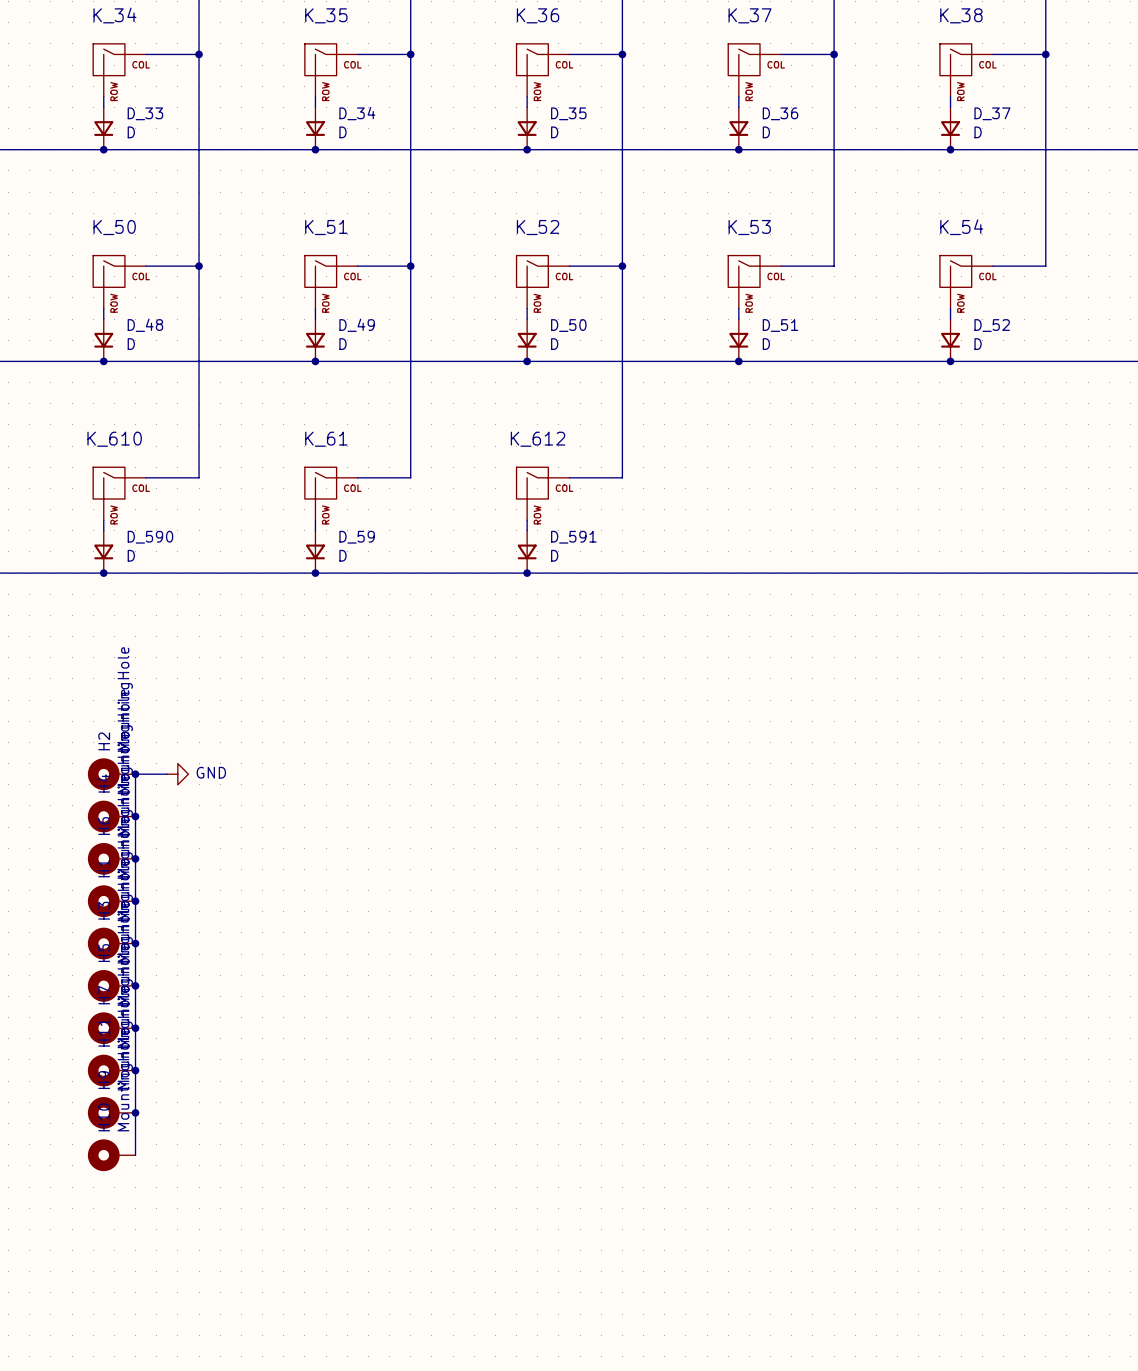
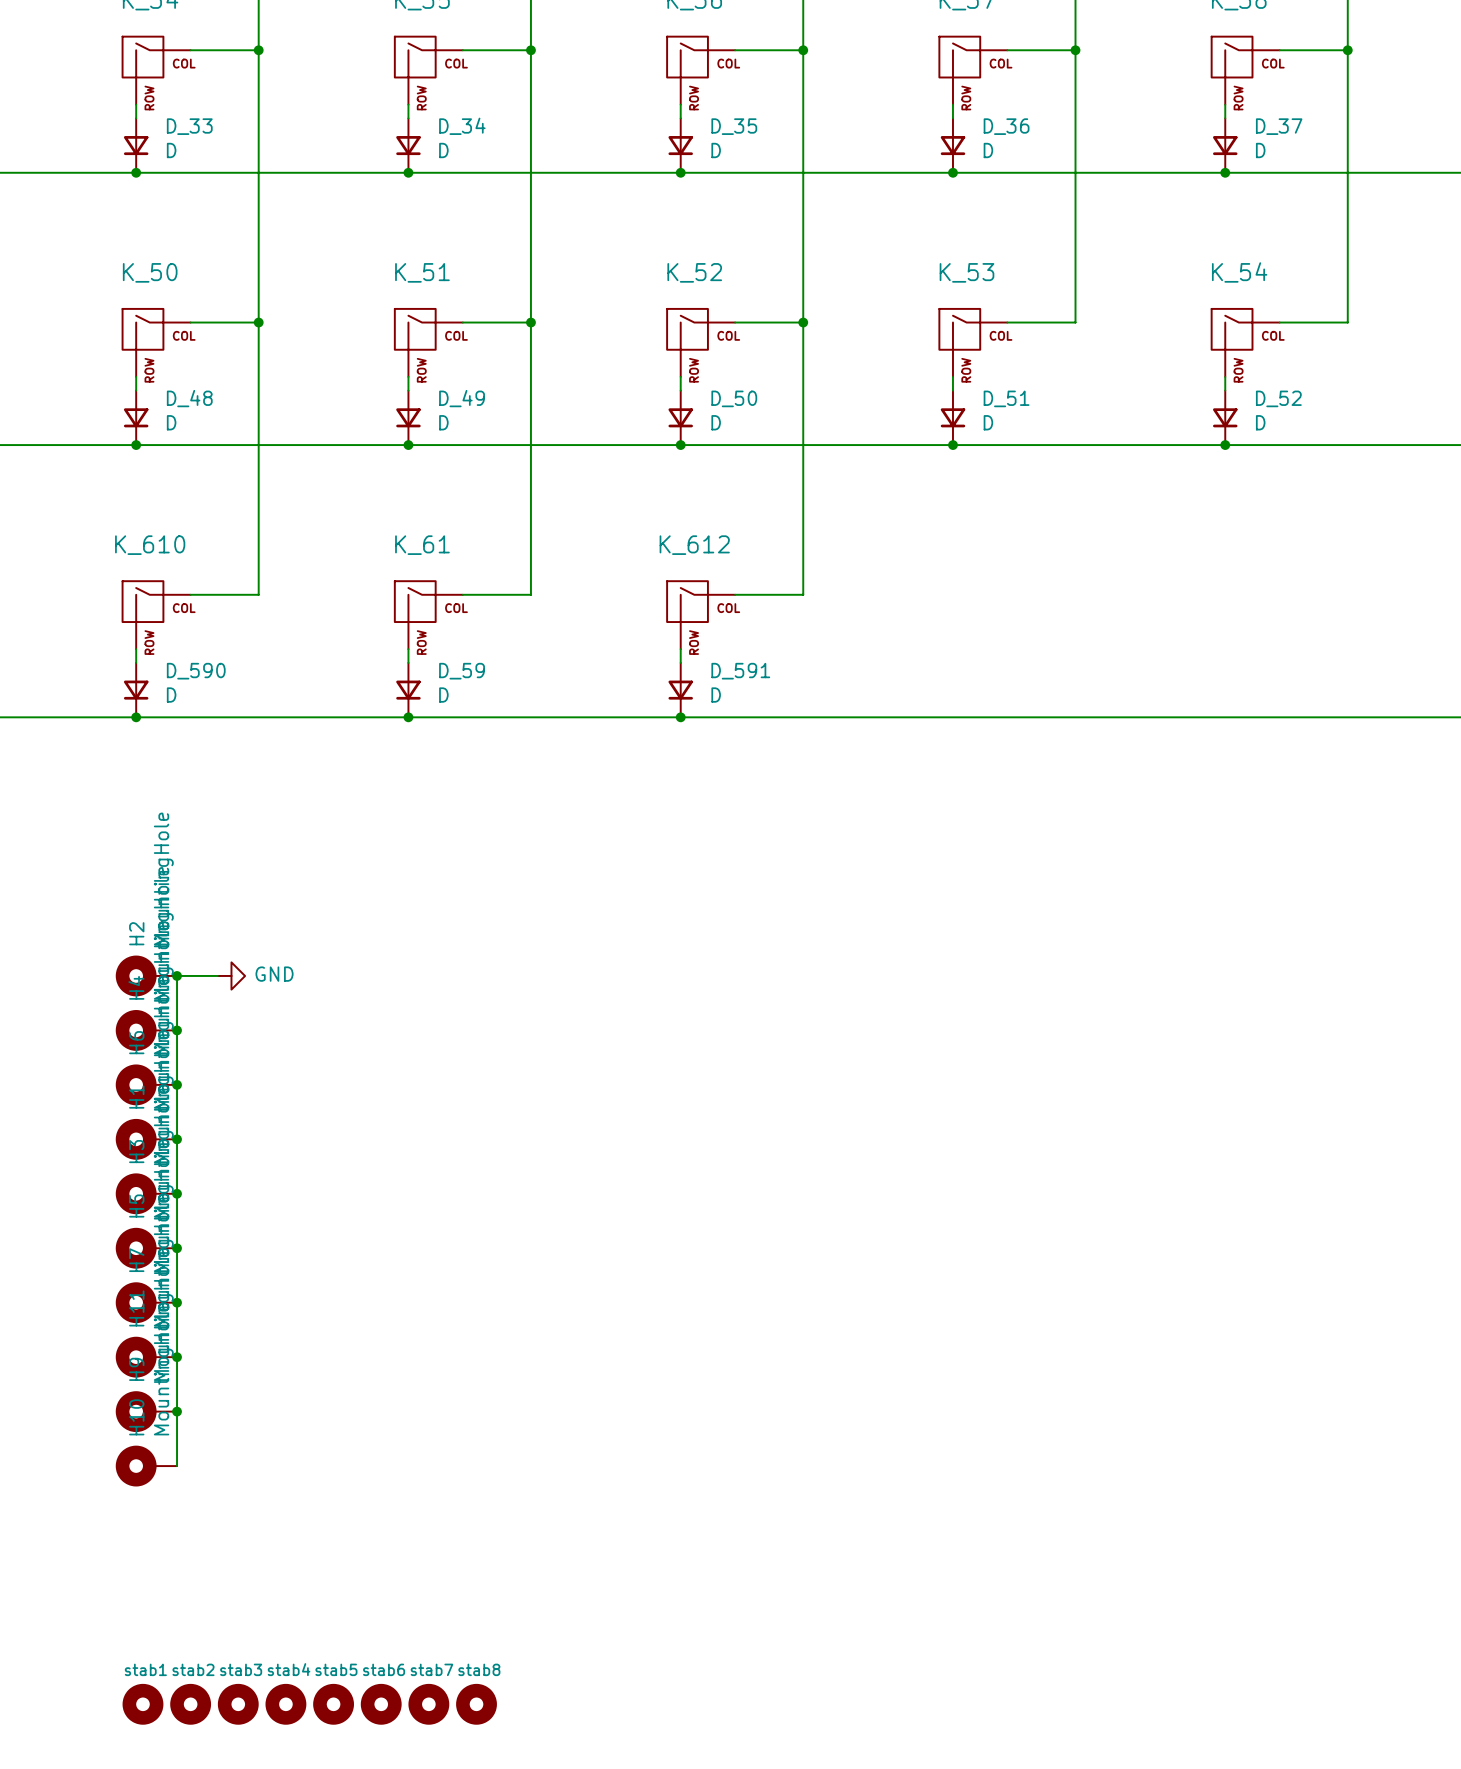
stab1: none -> (142, 1704)
stab2: none -> (190, 1704)
stab3: none -> (238, 1704)
stab4: none -> (285, 1704)
stab5: none -> (333, 1704)
stab6: none -> (381, 1704)
stab7: none -> (428, 1704)
stab8: none -> (476, 1704)

